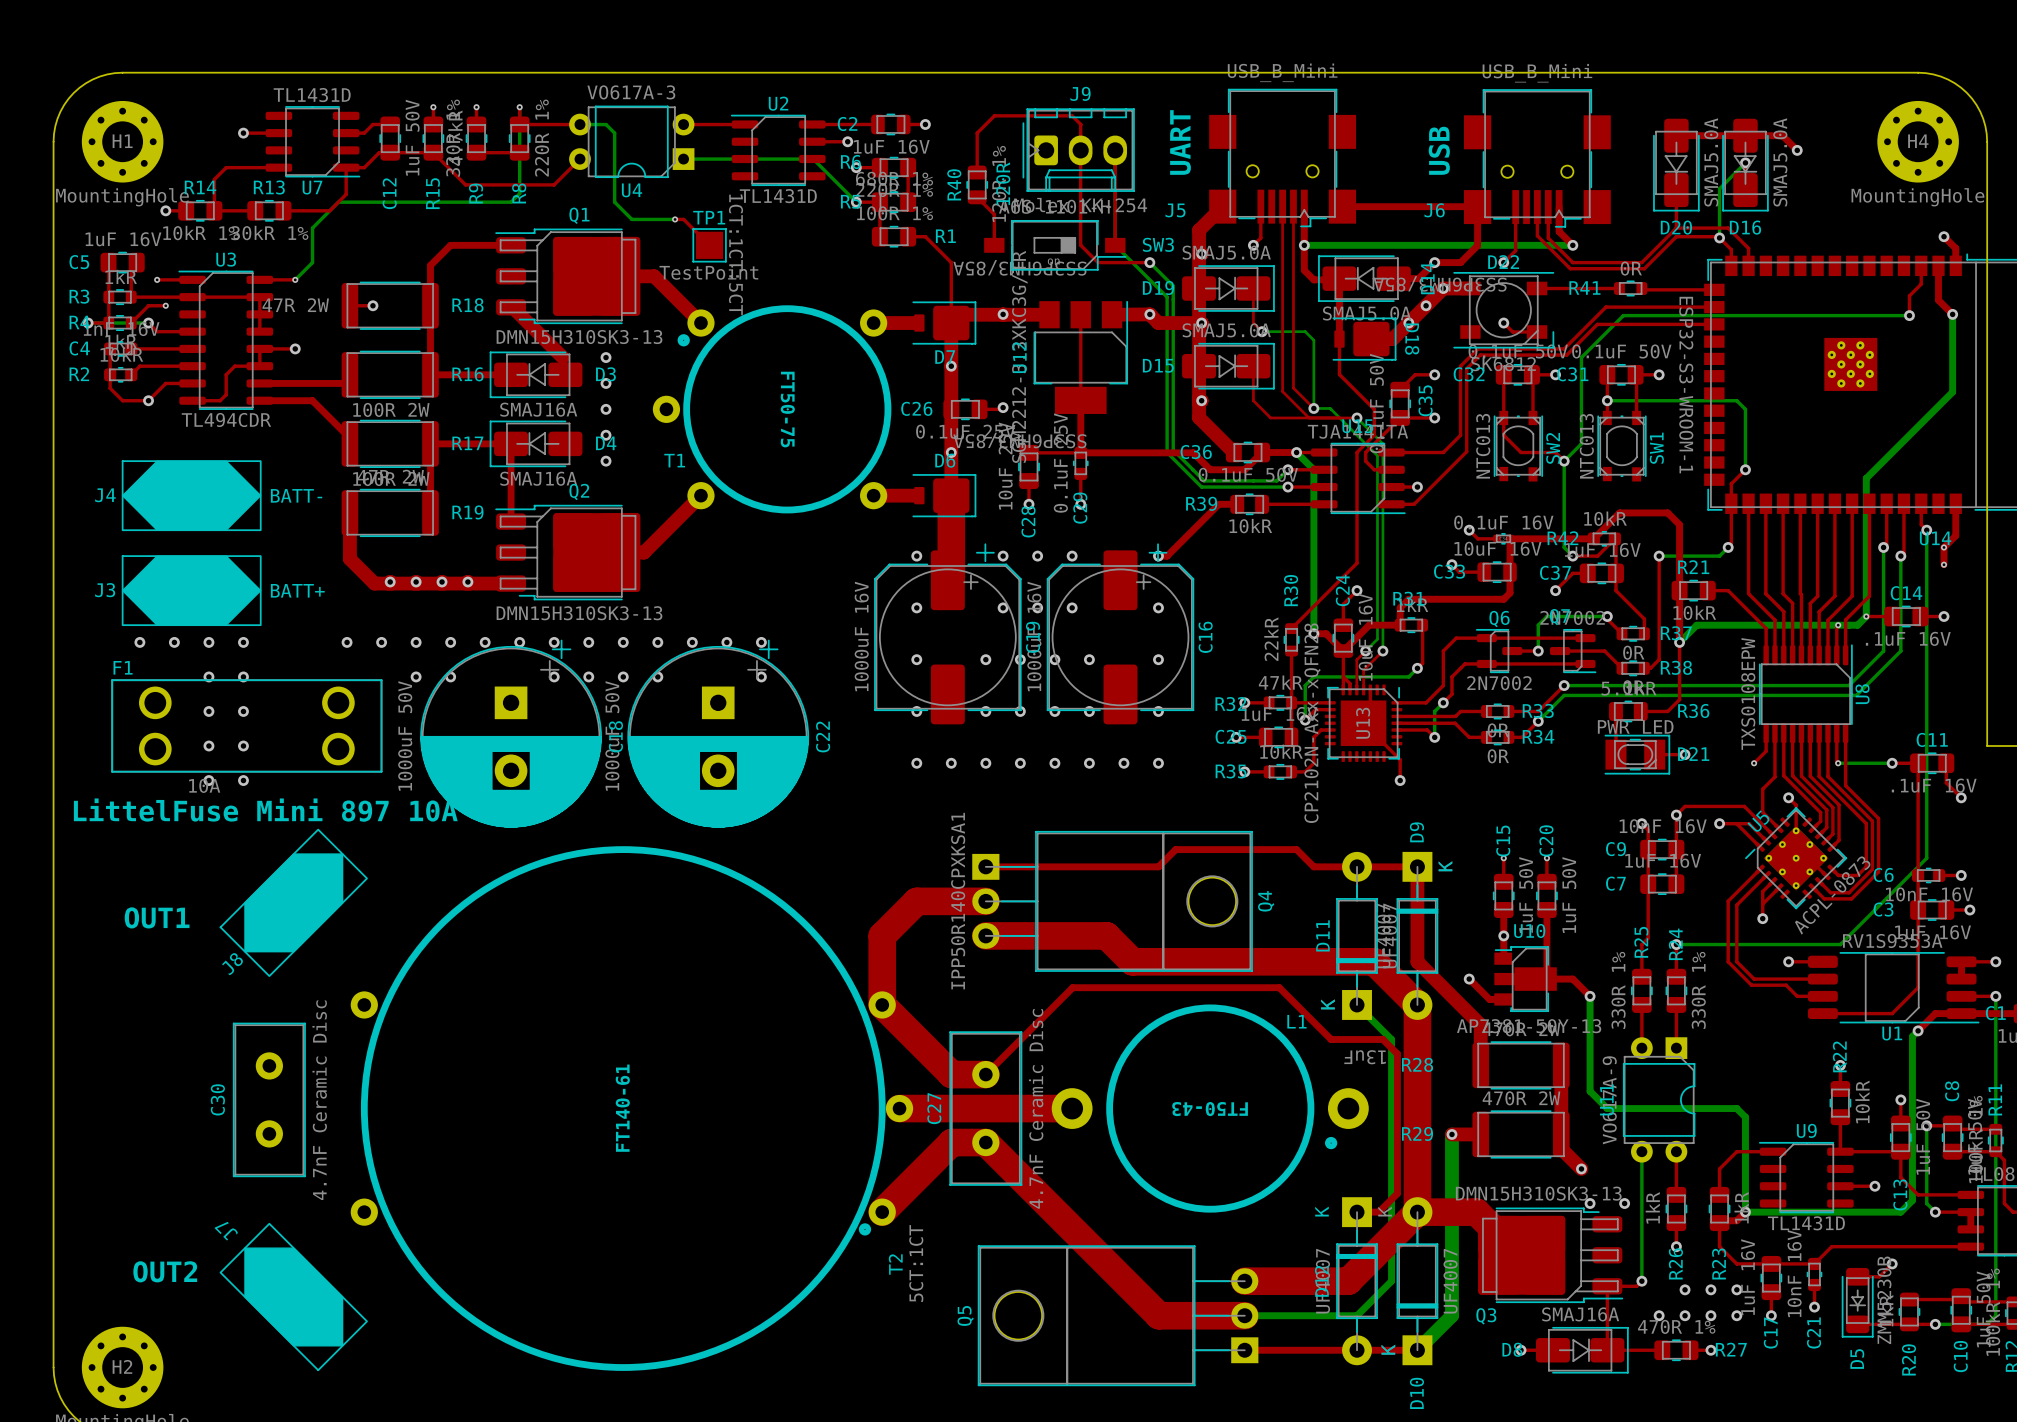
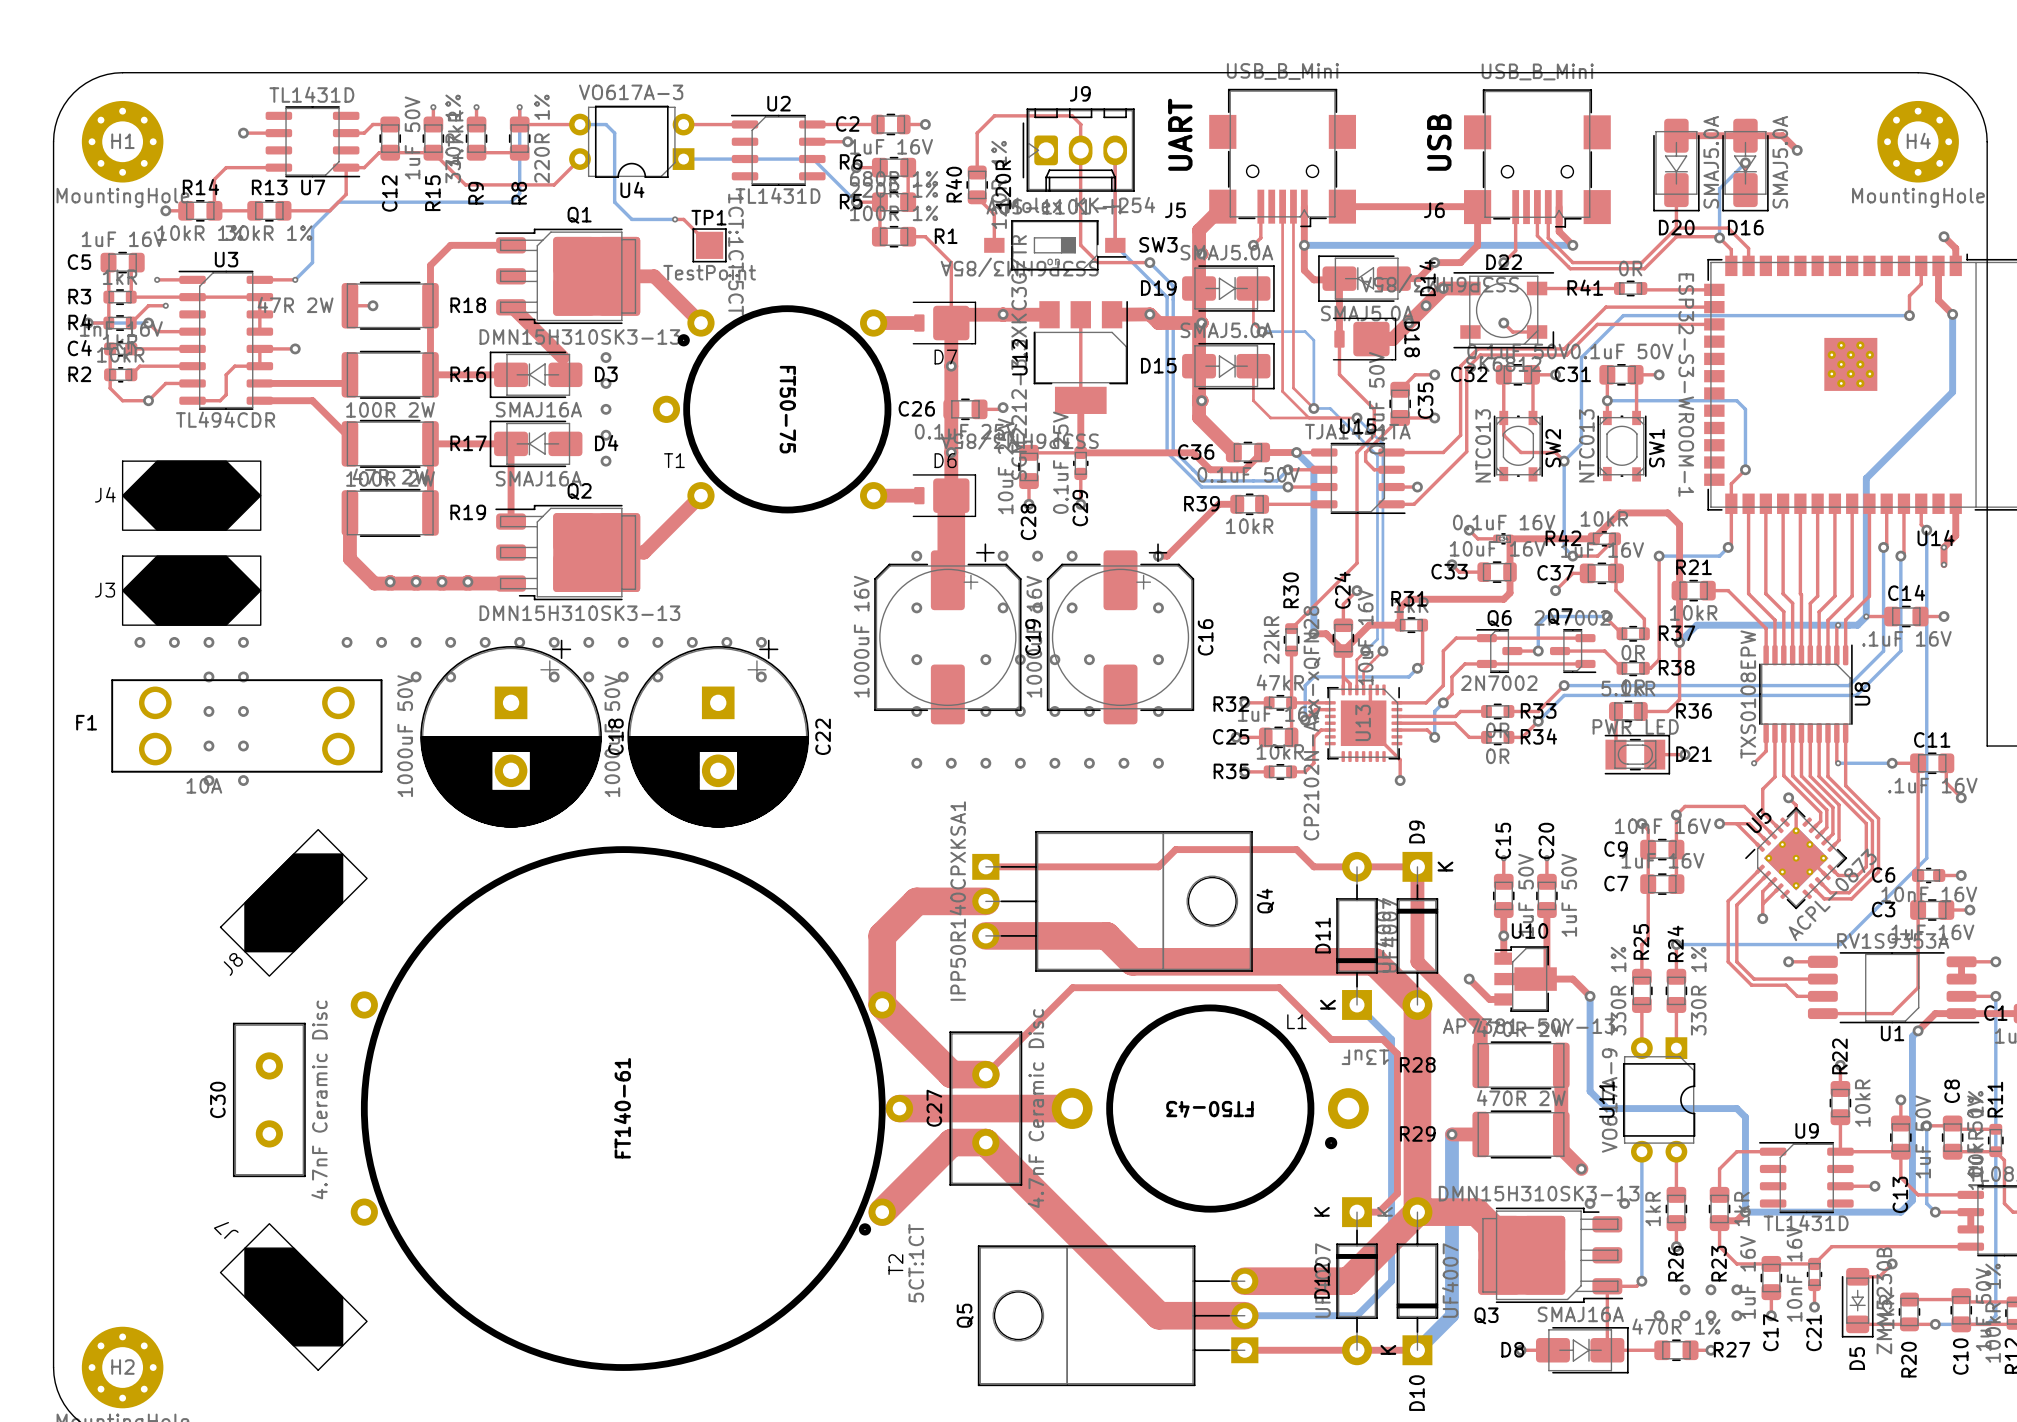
text: BATT- (296, 495) -> none
text: BATT+ (297, 590) -> none
F1 name position: F1 (123, 667) -> F1 (86, 722)
text: LittelFuse Mini 897 10A (265, 810) -> none
text: OUT1 (157, 917) -> none
text: OUT2 (165, 1271) -> none

